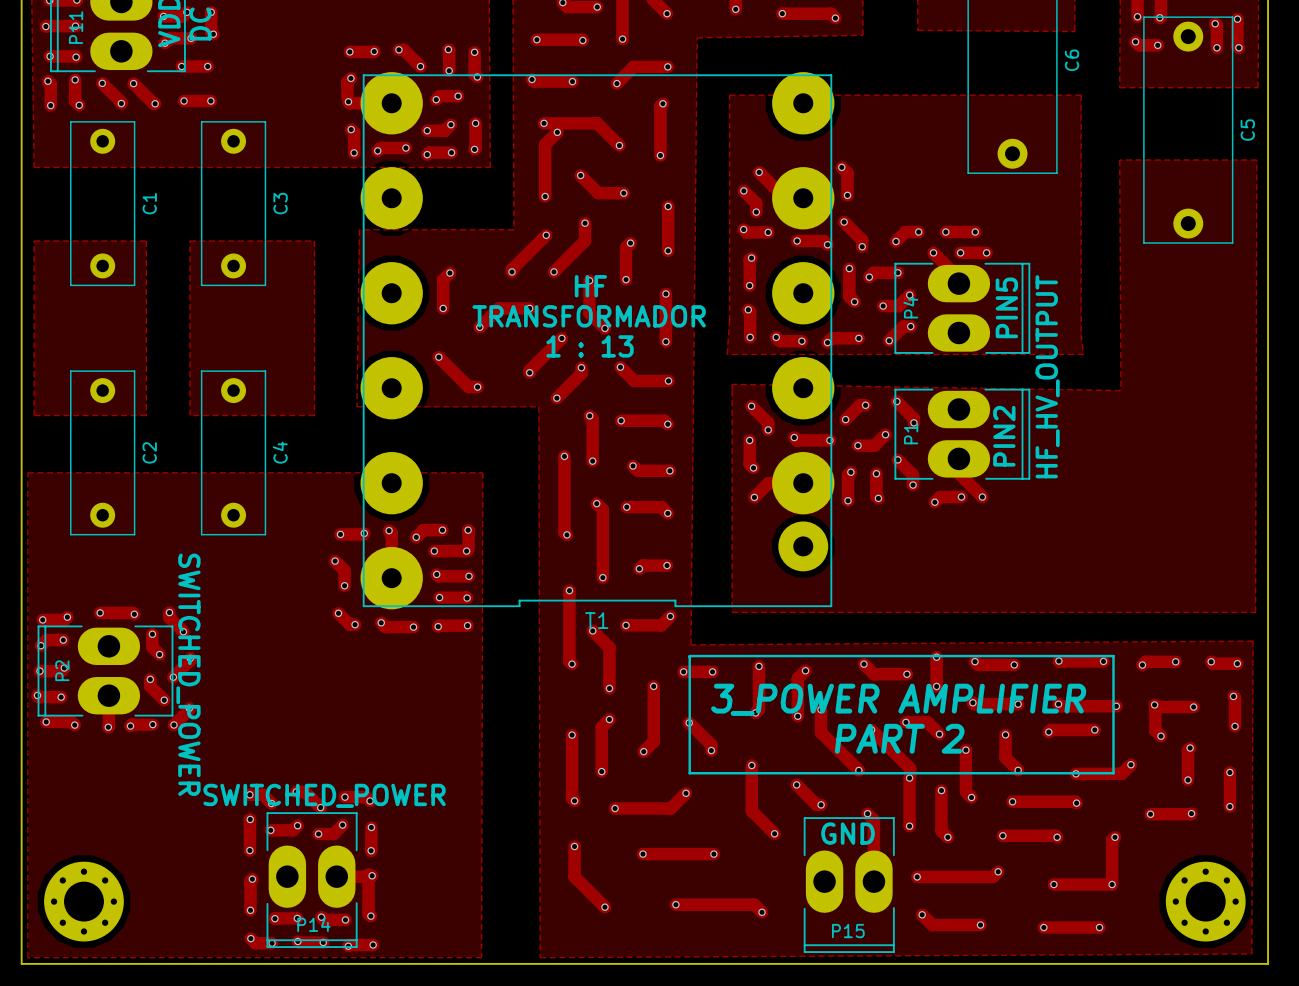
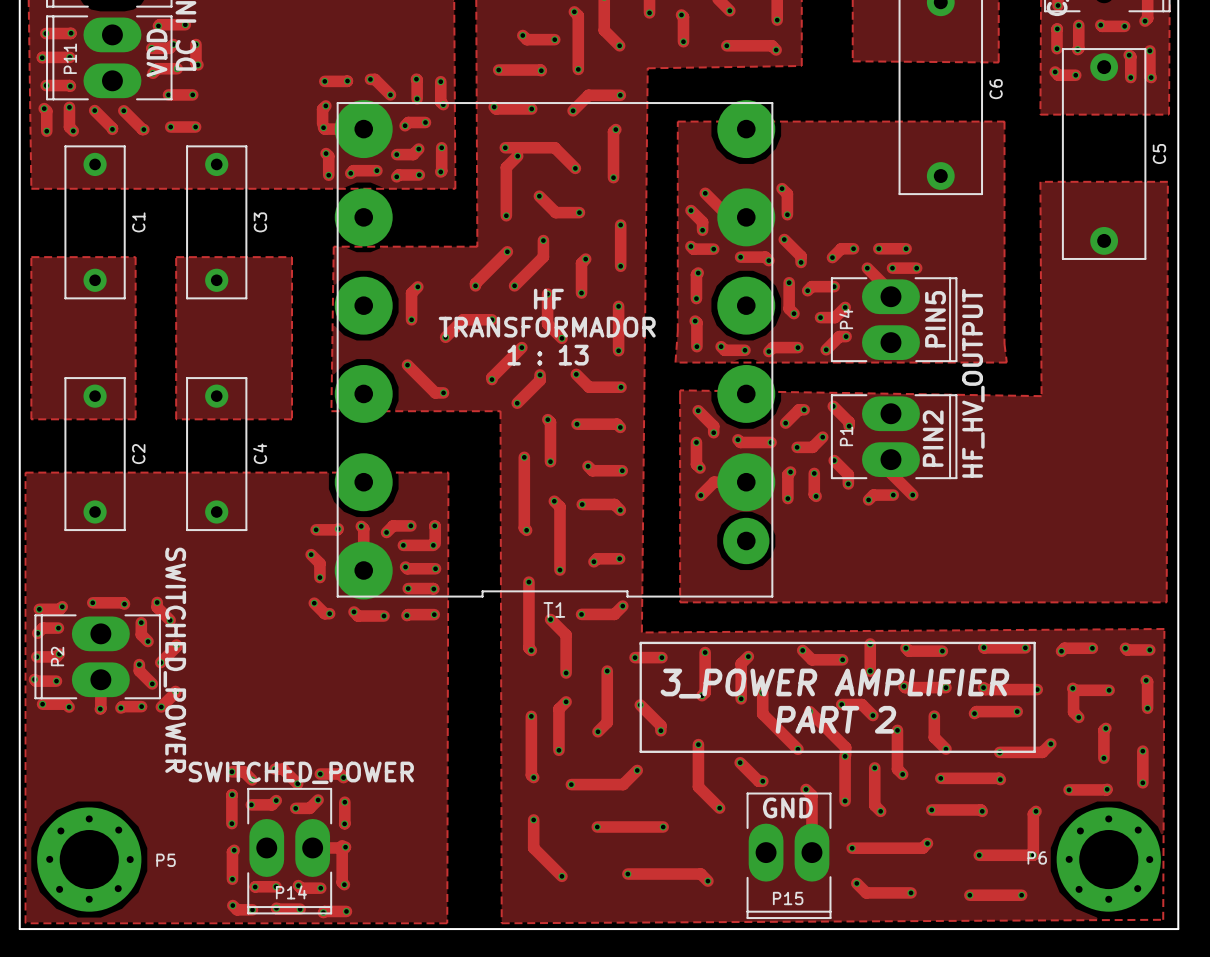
P5: none -> (89, 859)
P6: none -> (1108, 859)
part: (83, 901) -> none
part: (1205, 901) -> none

